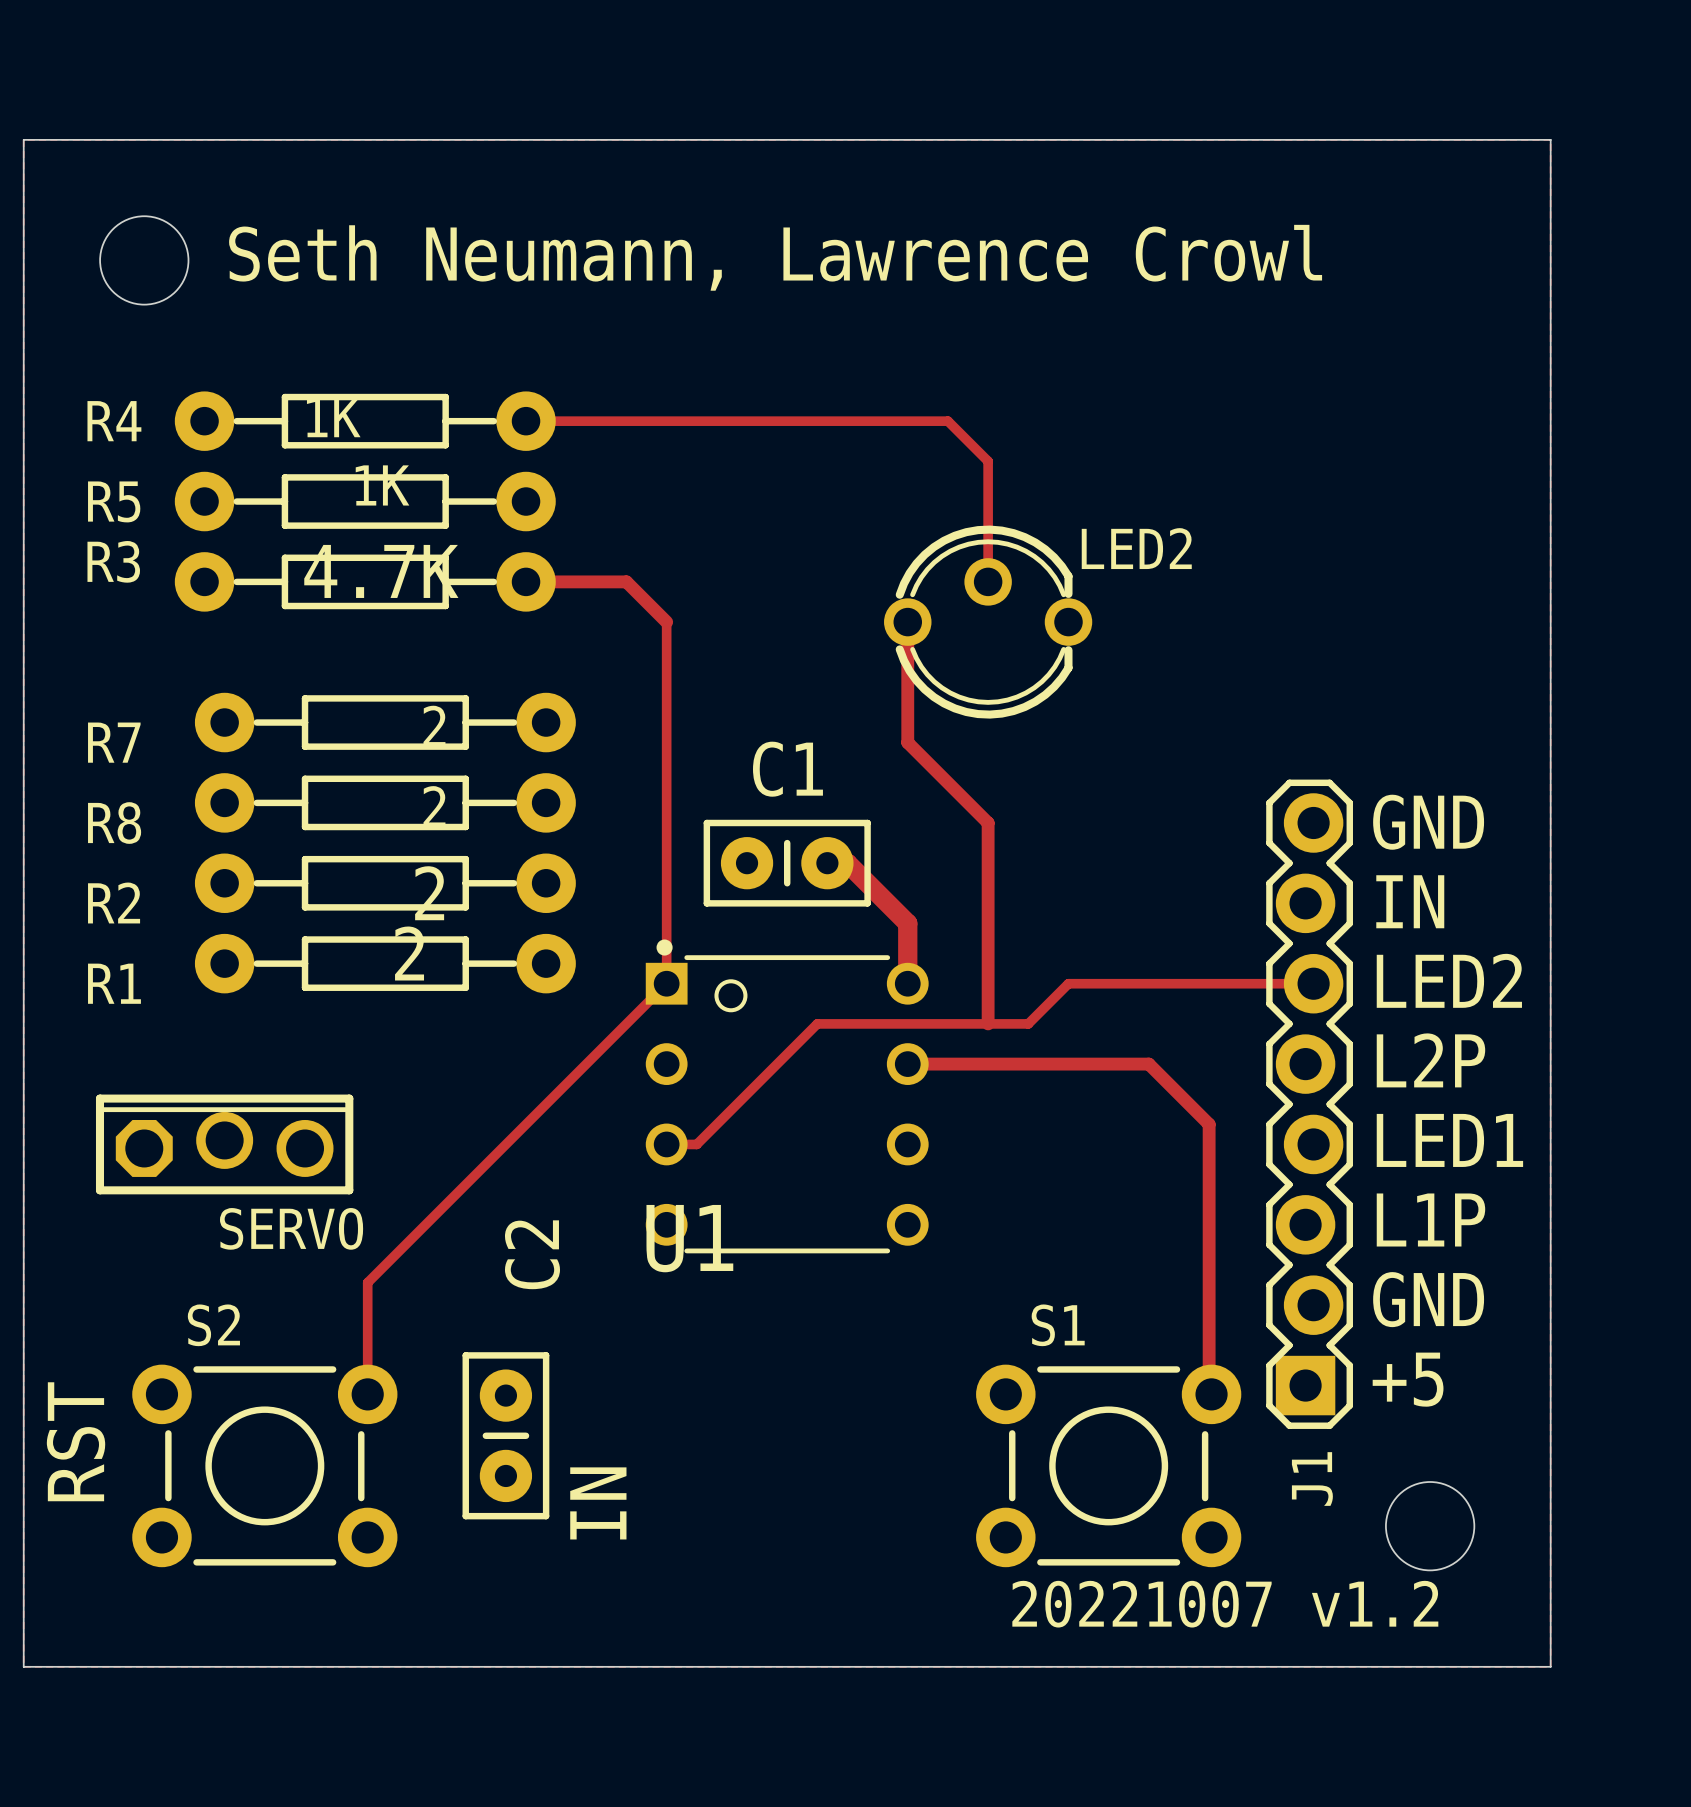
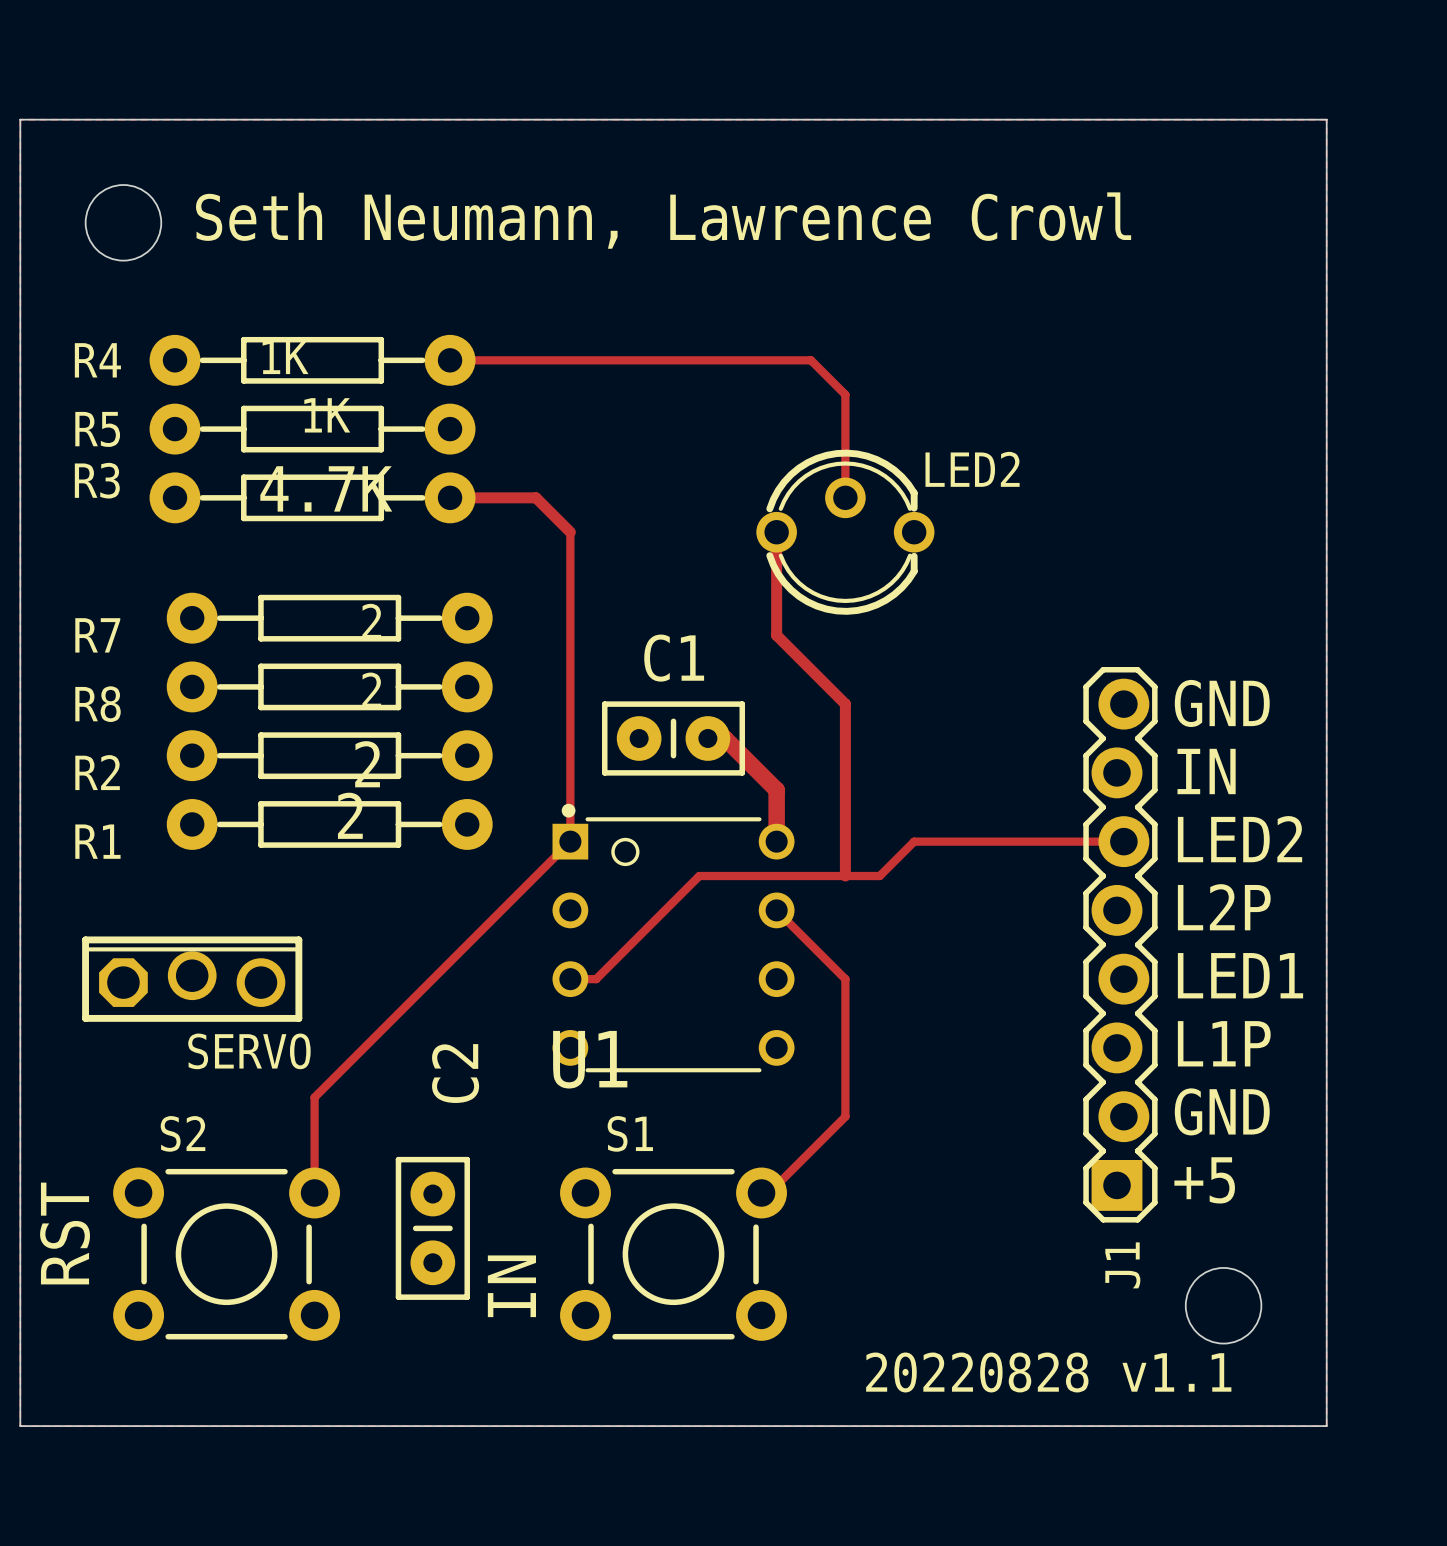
track: (907, 1064) (1148, 1064) (1209, 1124) (1209, 1391) (1211, 1394) -> (776, 910) (845, 979) (845, 1116) (769, 1192)
S1 position: (1108, 1465) -> (673, 1254)
text: 20221007 v1.2 (1225, 1604) -> 20220828 v1.1 (1048, 1372)

